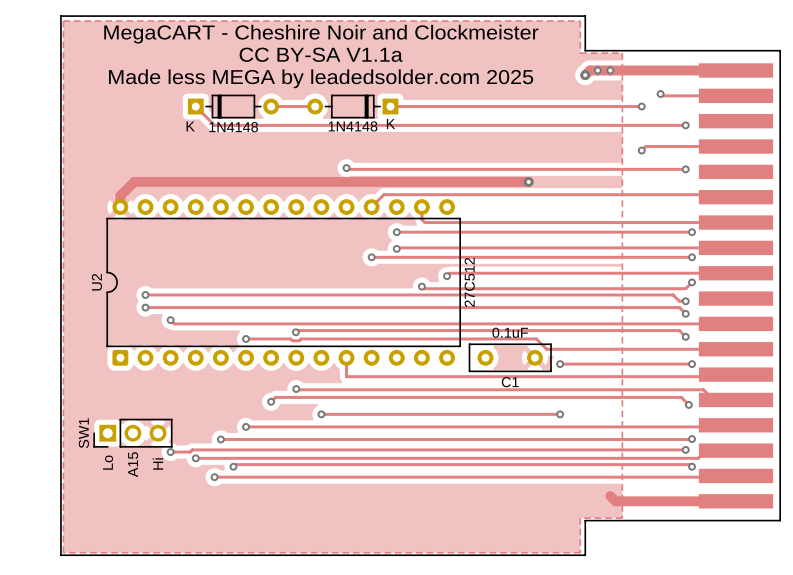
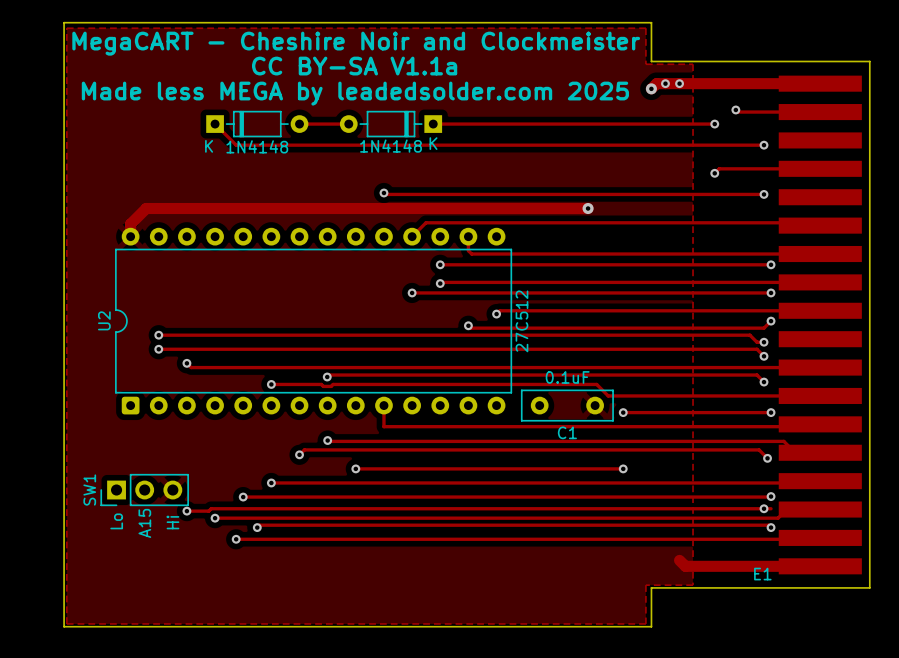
track: none -> (764, 508) (771, 508)
E1 name: none -> E1 (762, 574)

